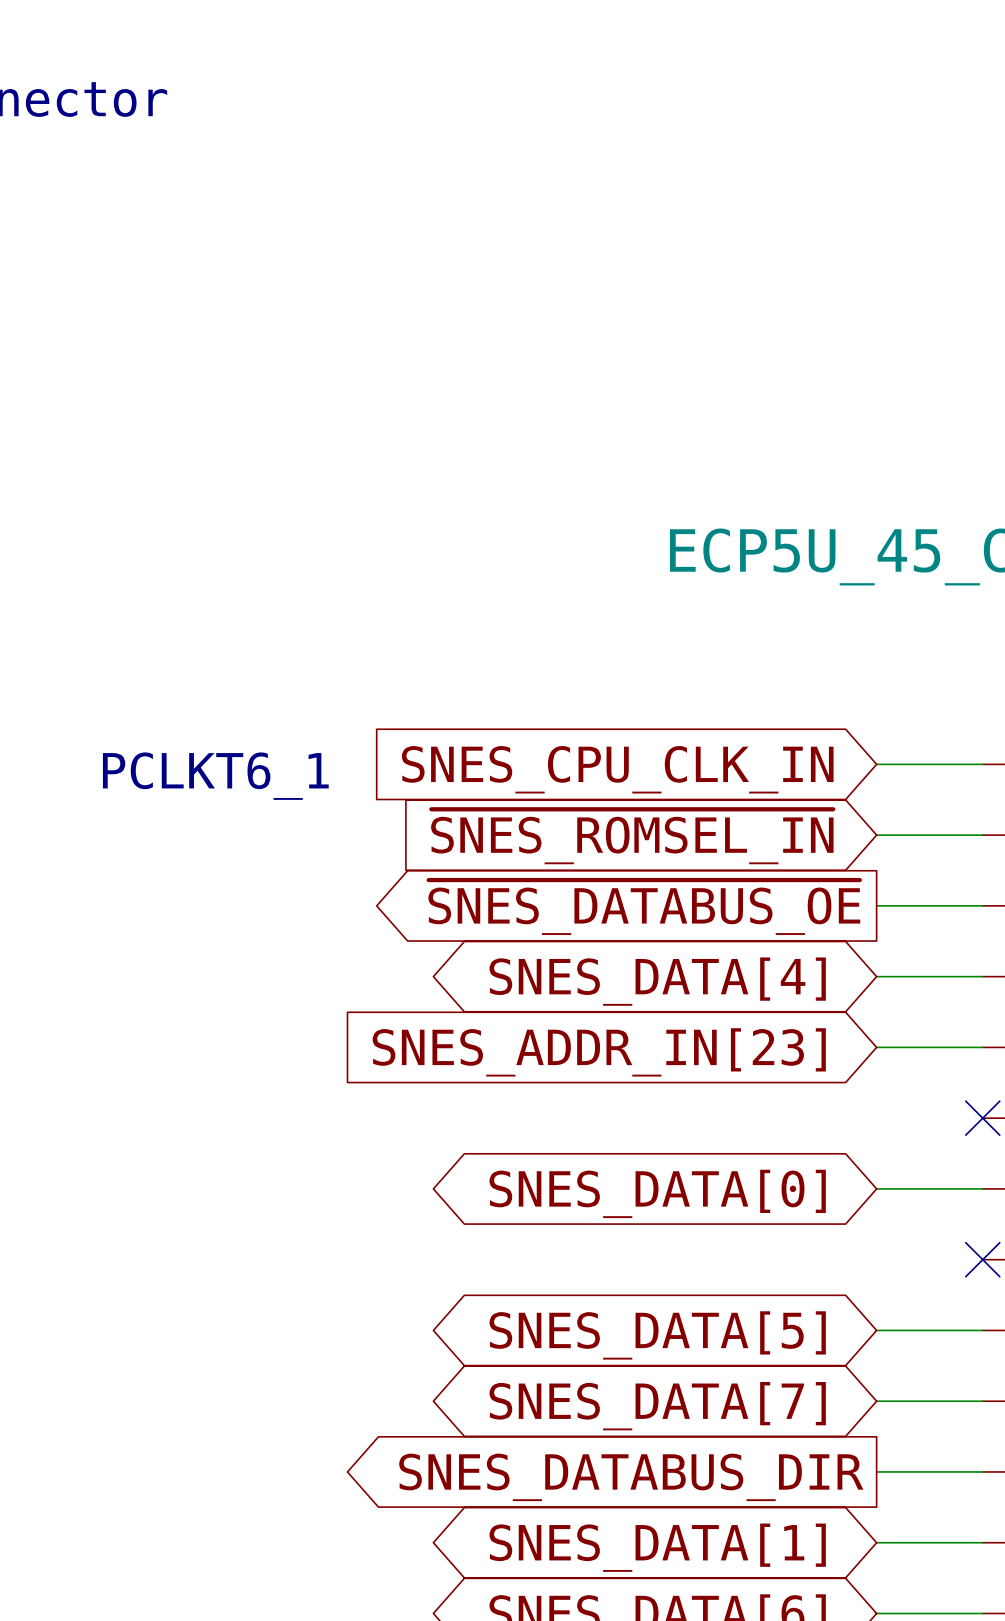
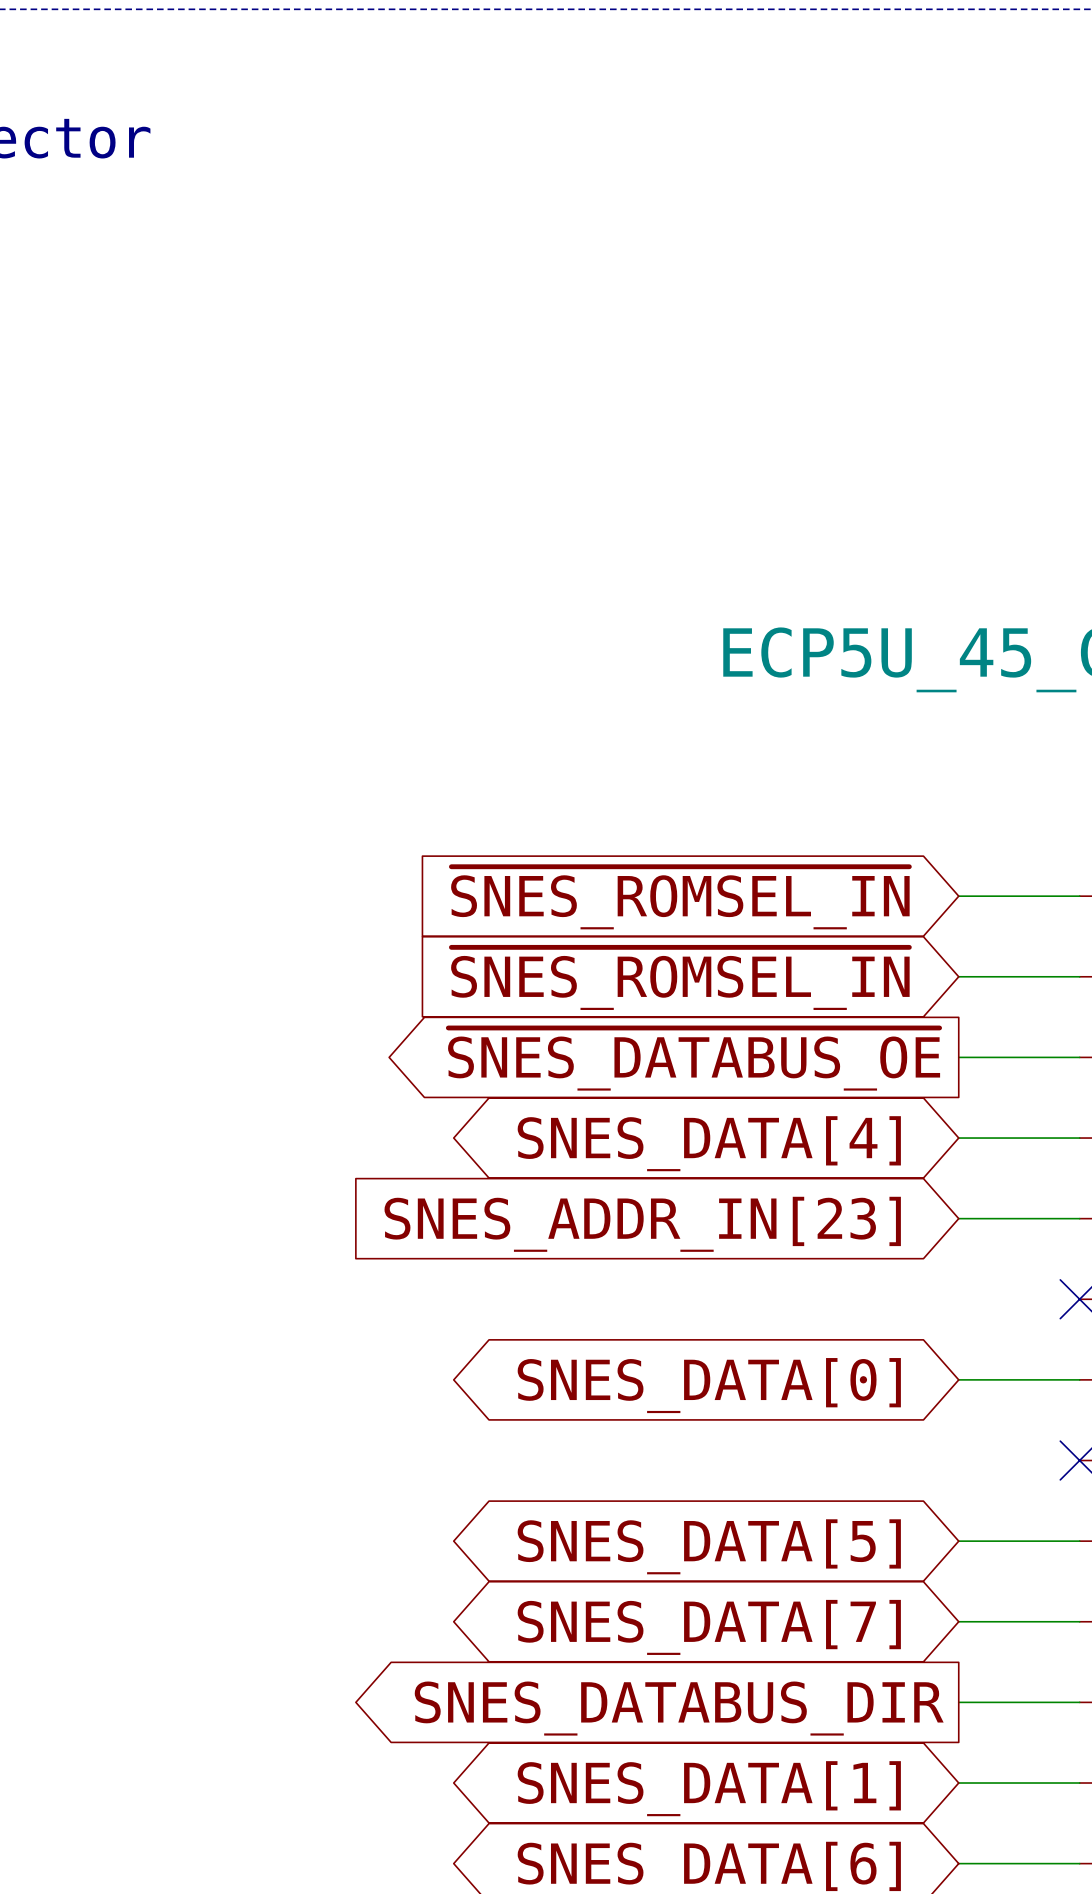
global label: SNES_CPU_CLK_IN (617, 769) -> ~{SNES_ROMSEL_IN} (680, 898)
text: PCLKT6_1 (215, 776) -> none

